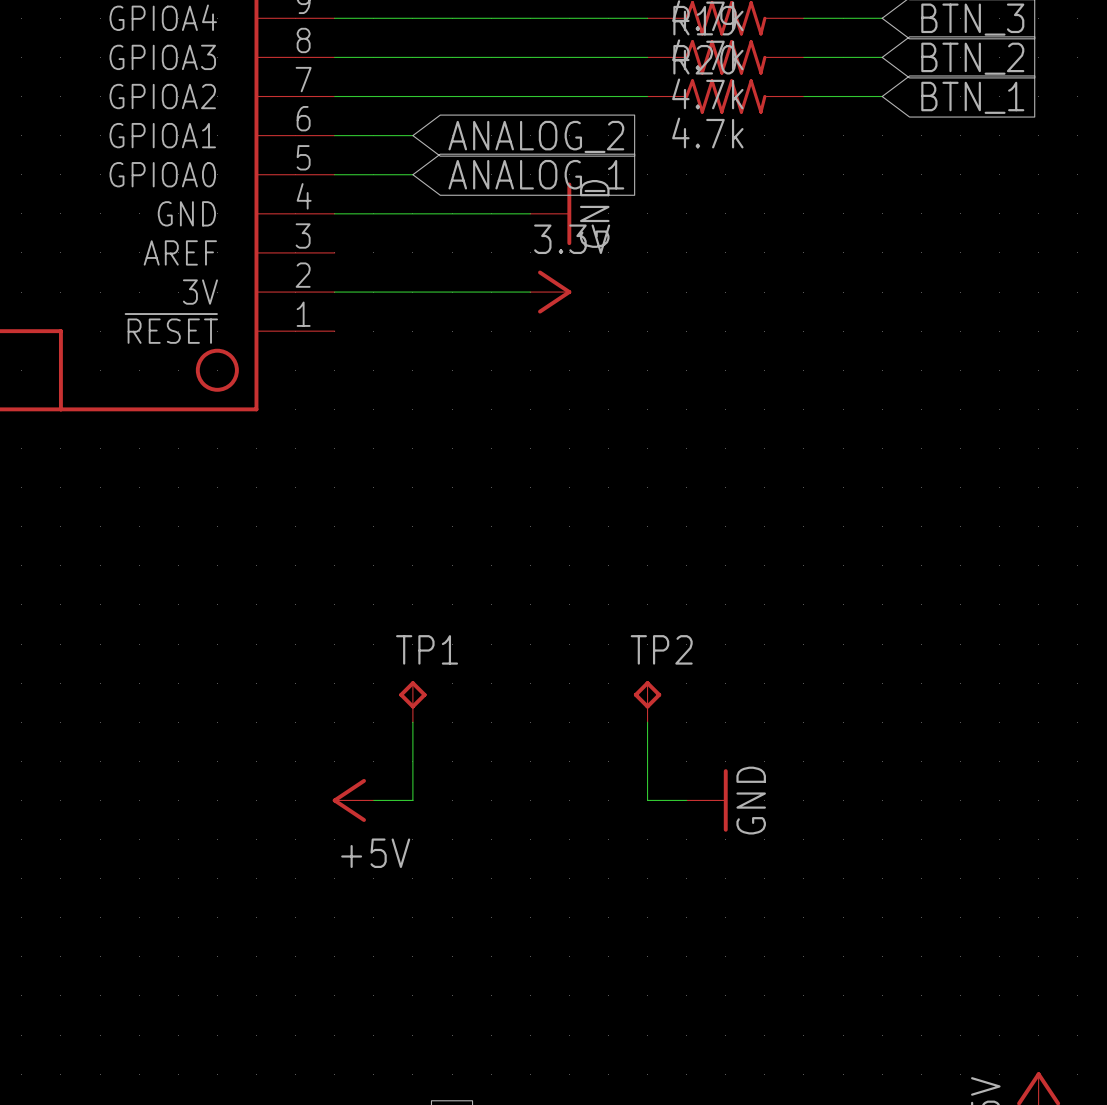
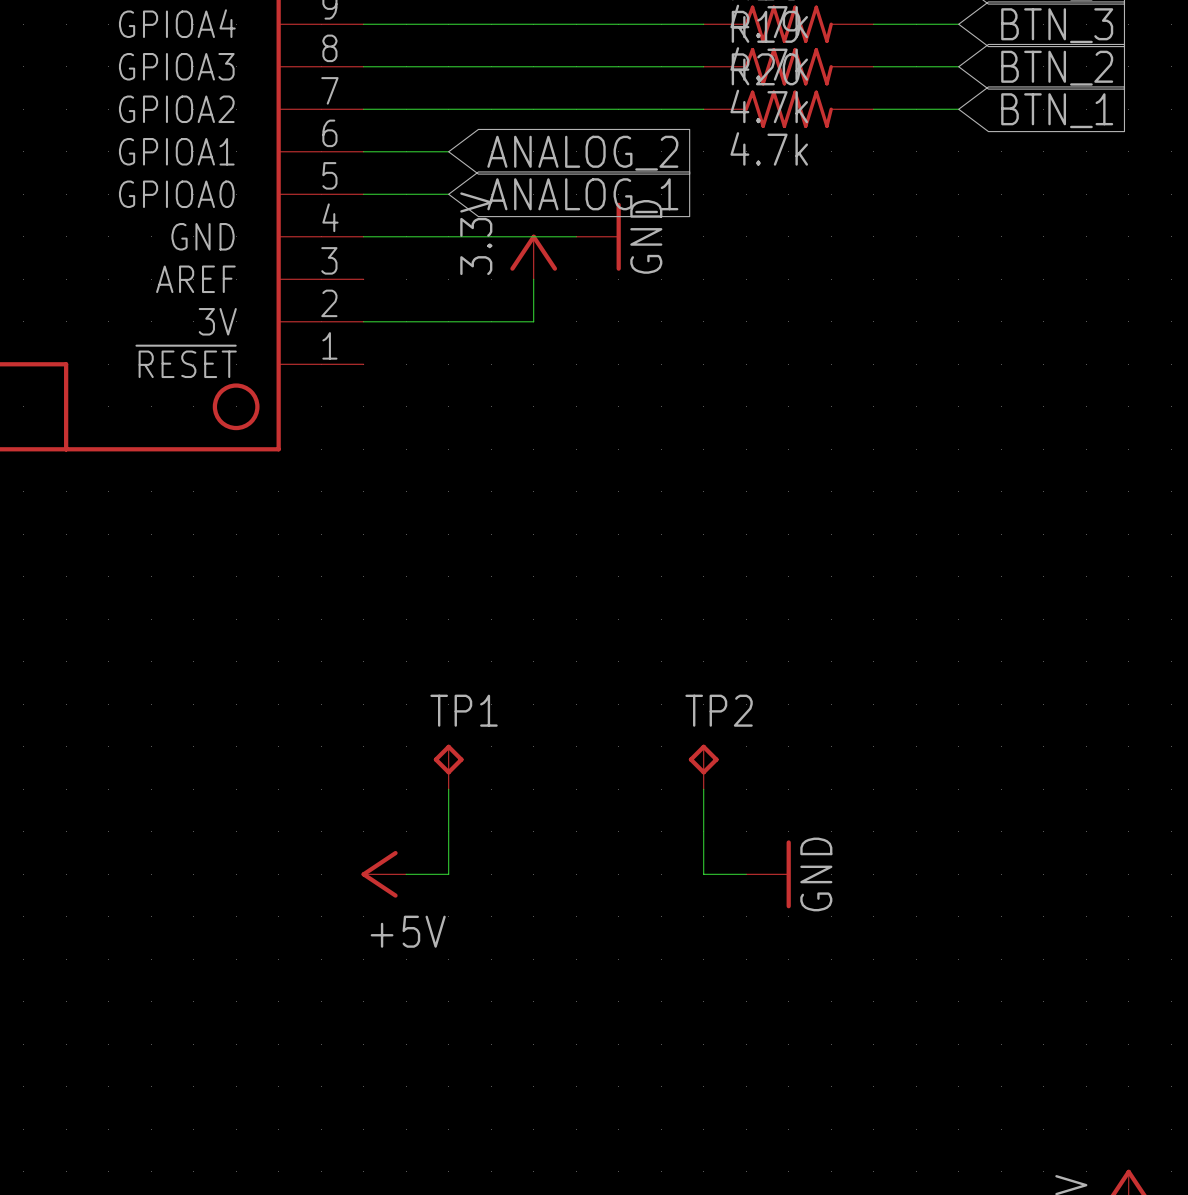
wire: (491, 292) (530, 292) -> (533, 321) (533, 279)
power symbol position: 3.3V (550, 292) -> 3.3V (533, 256)
power symbol rotation: 0° (554, 292) -> 90° counterclockwise (533, 252)

